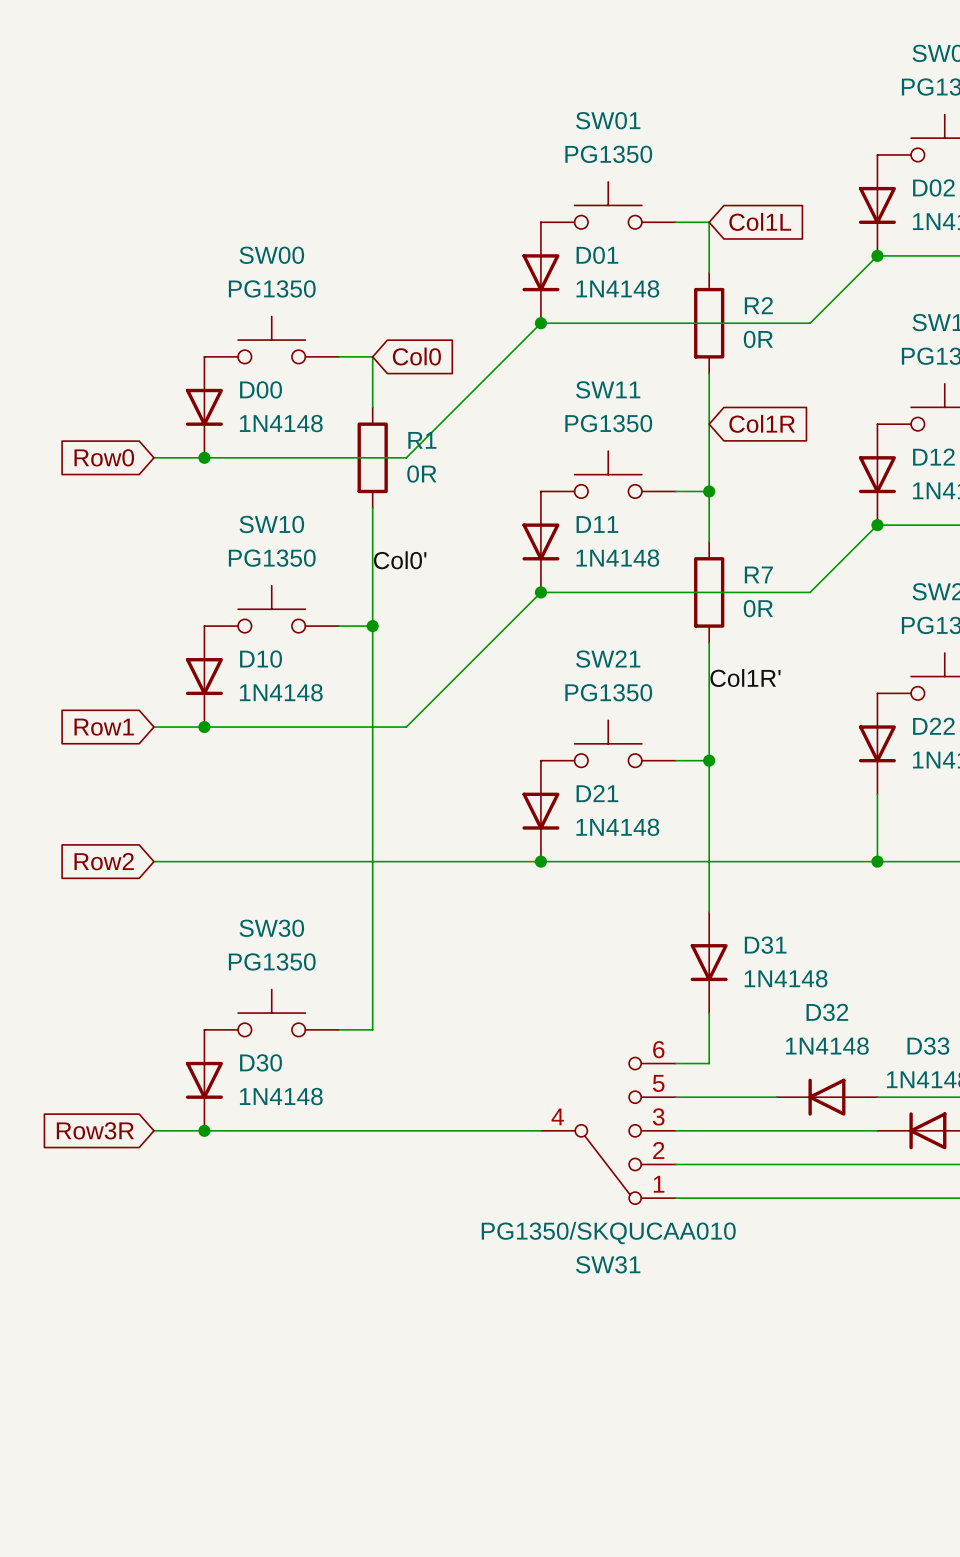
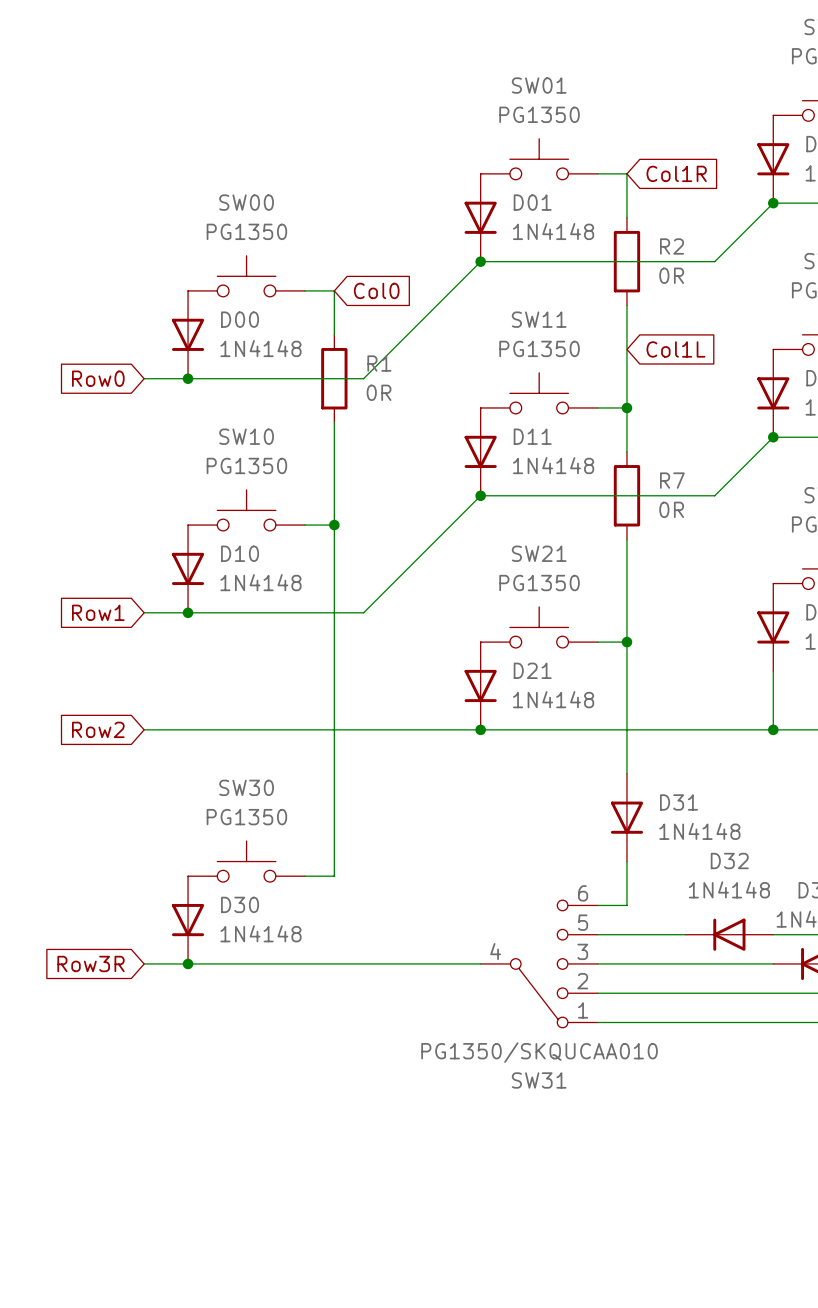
global label: Col1L (760, 221) -> Col1R (676, 173)
global label: Col1R (762, 423) -> Col1L (675, 349)
label: Col0' (400, 560) -> none
label: Col1R' (745, 678) -> none

